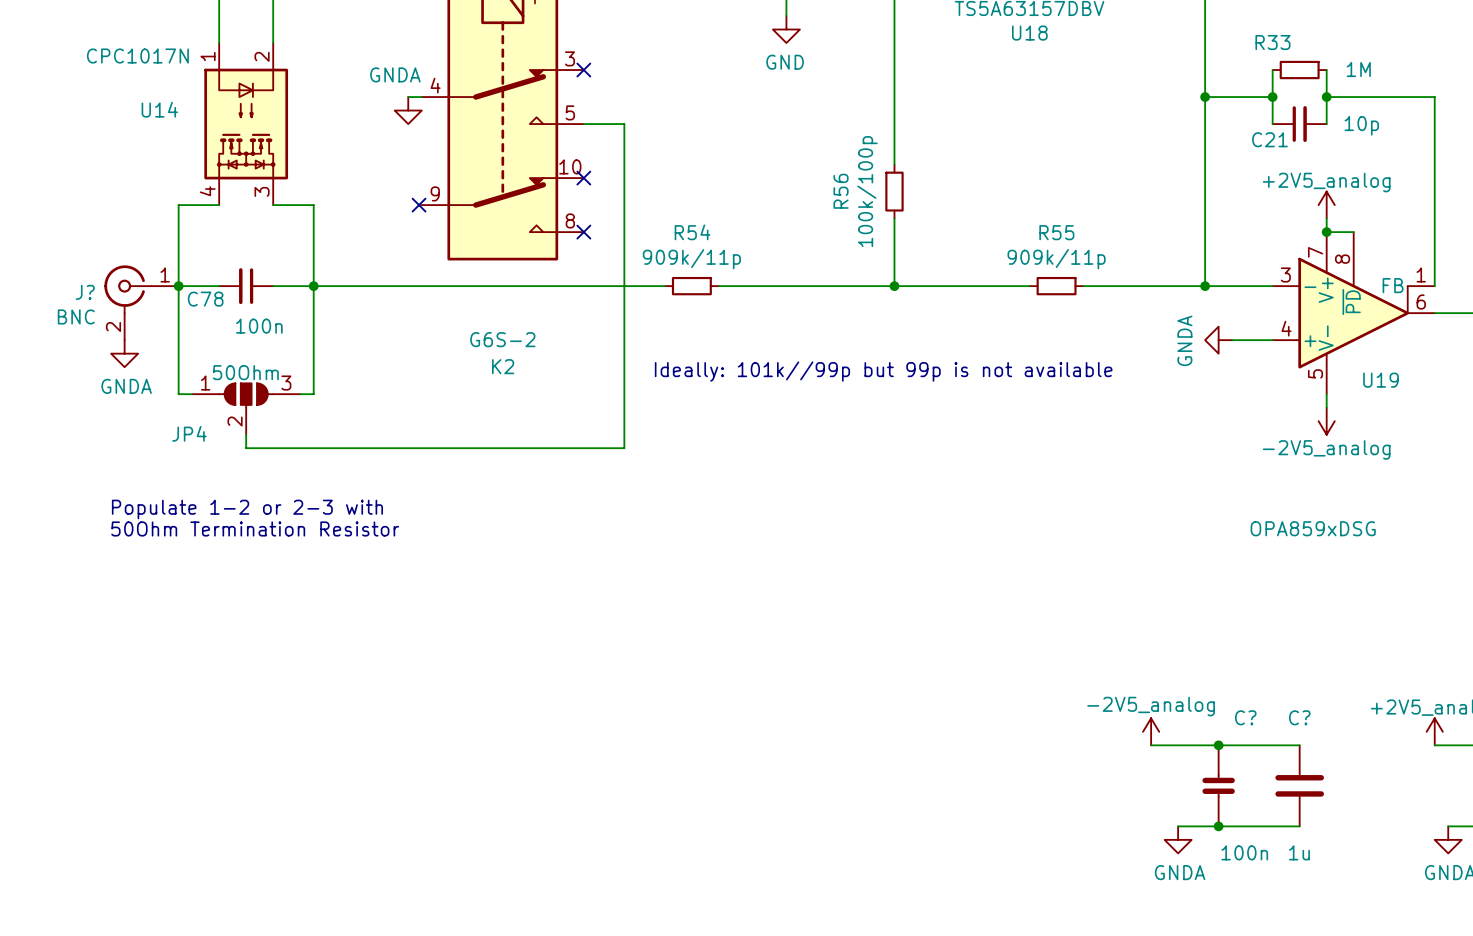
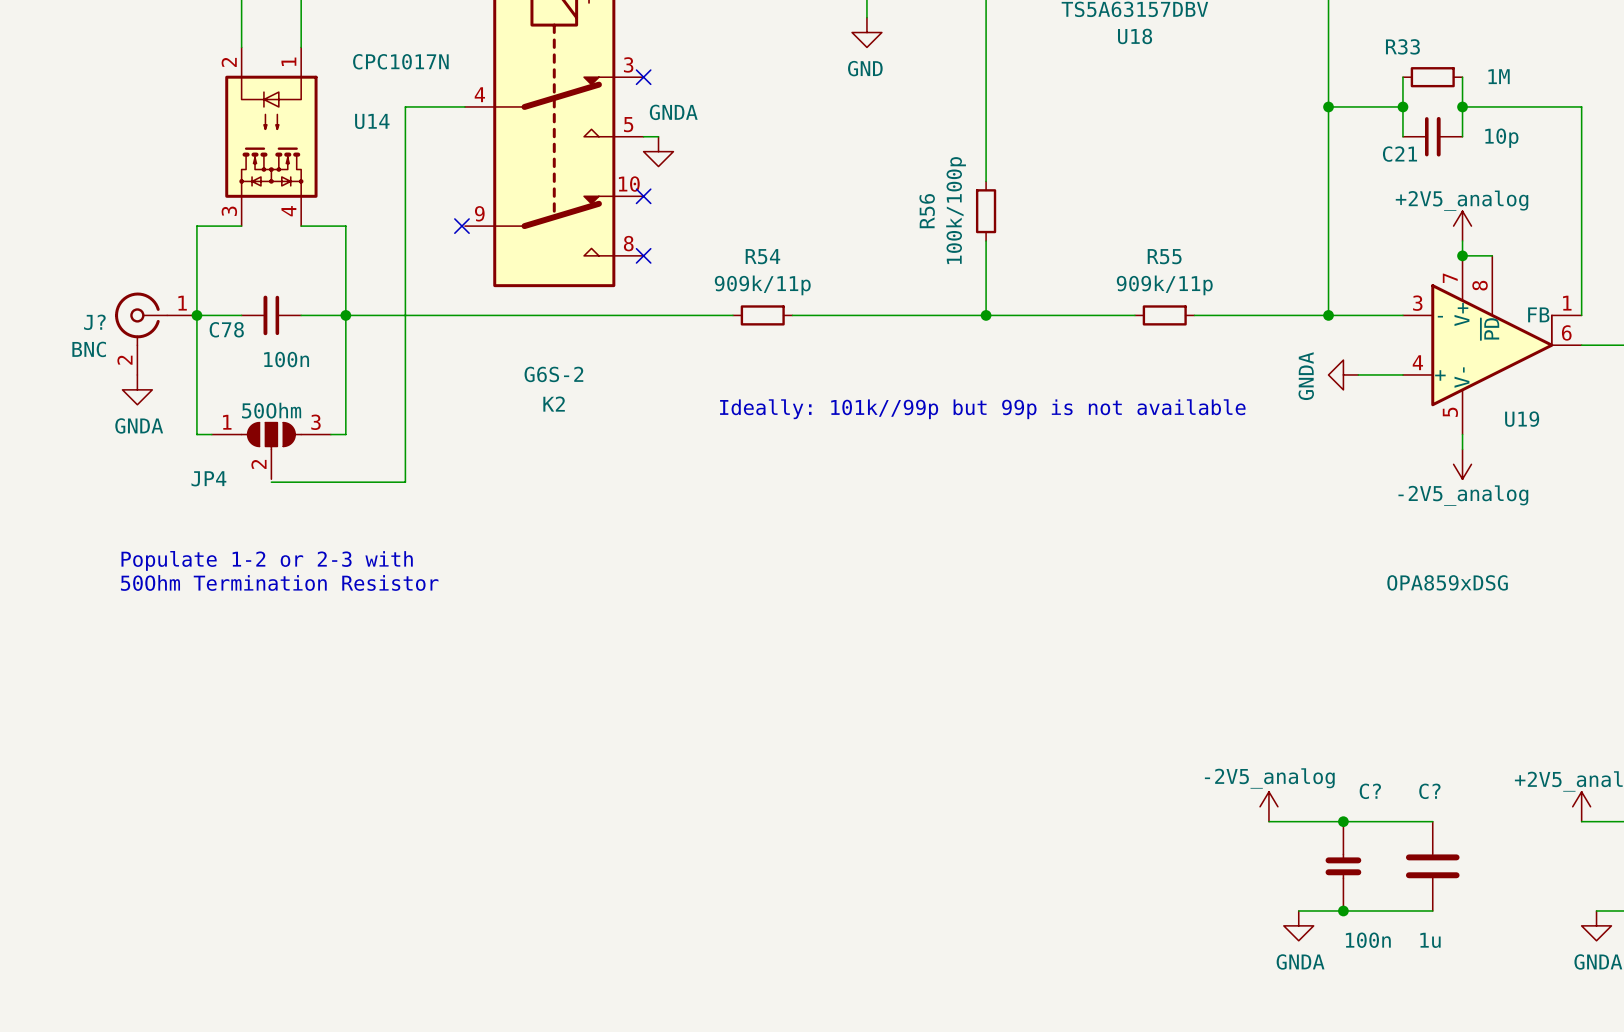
power symbol text position: GNDA (395, 74) -> GNDA (673, 112)
wire: none -> (450, 106) (405, 106) (405, 482) (271, 482)
power symbol position: GNDA (408, 110) -> GNDA (658, 151)
U14 flip: as is (246, 124) -> left-right (271, 136)
wire: (597, 124) (624, 124) (624, 448) (246, 448) (246, 434) -> none

